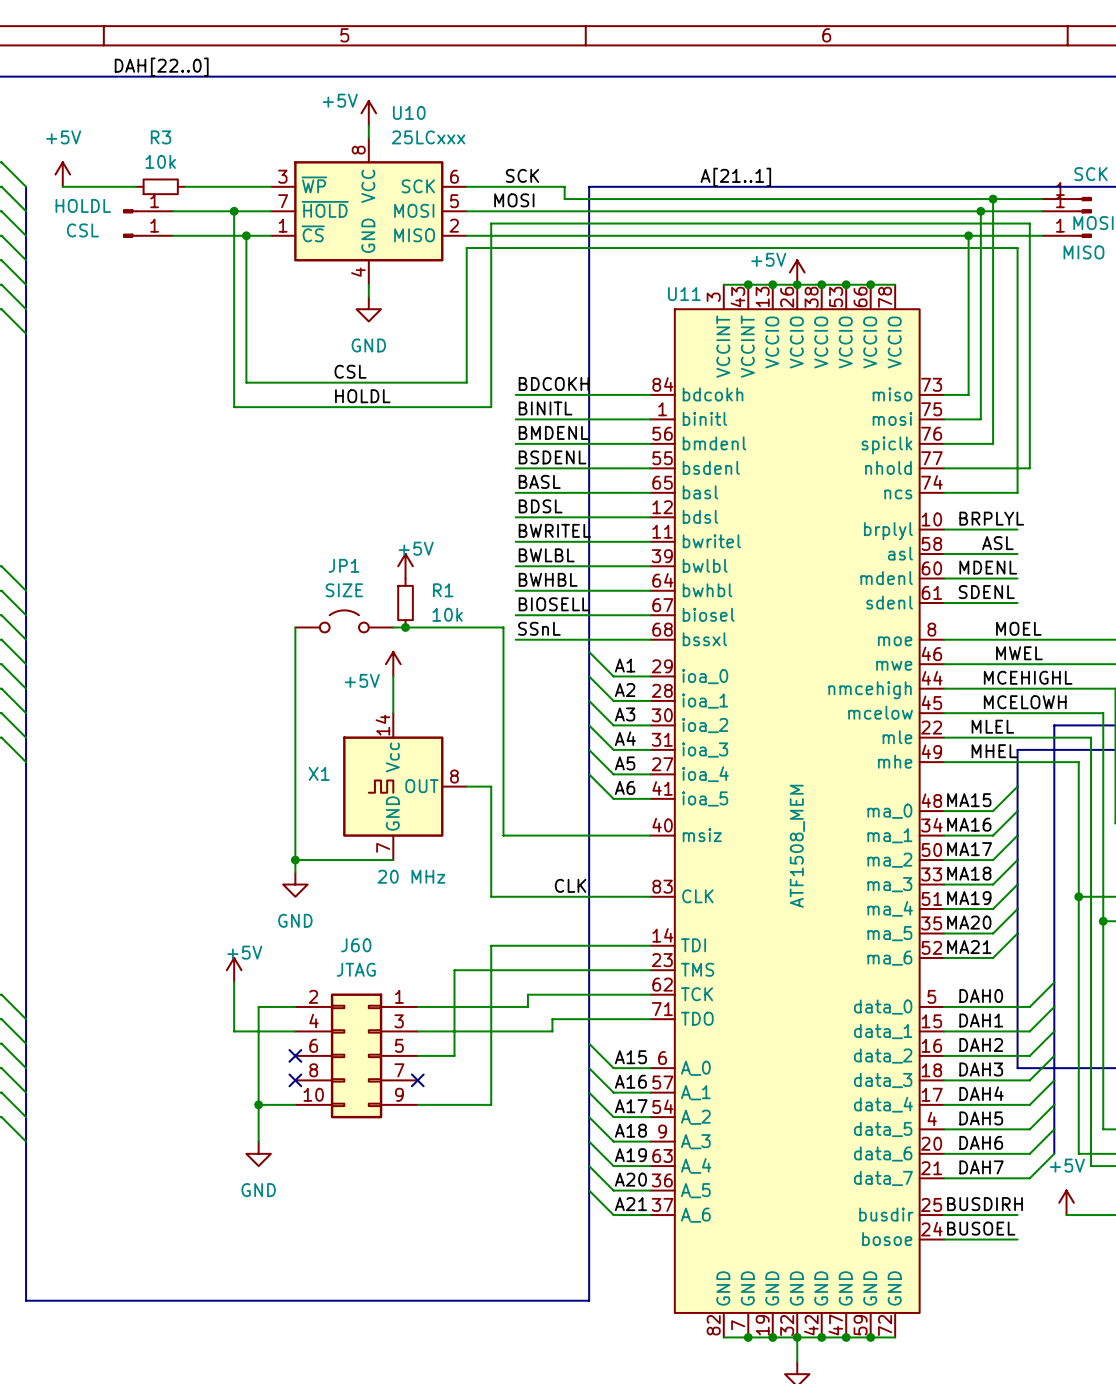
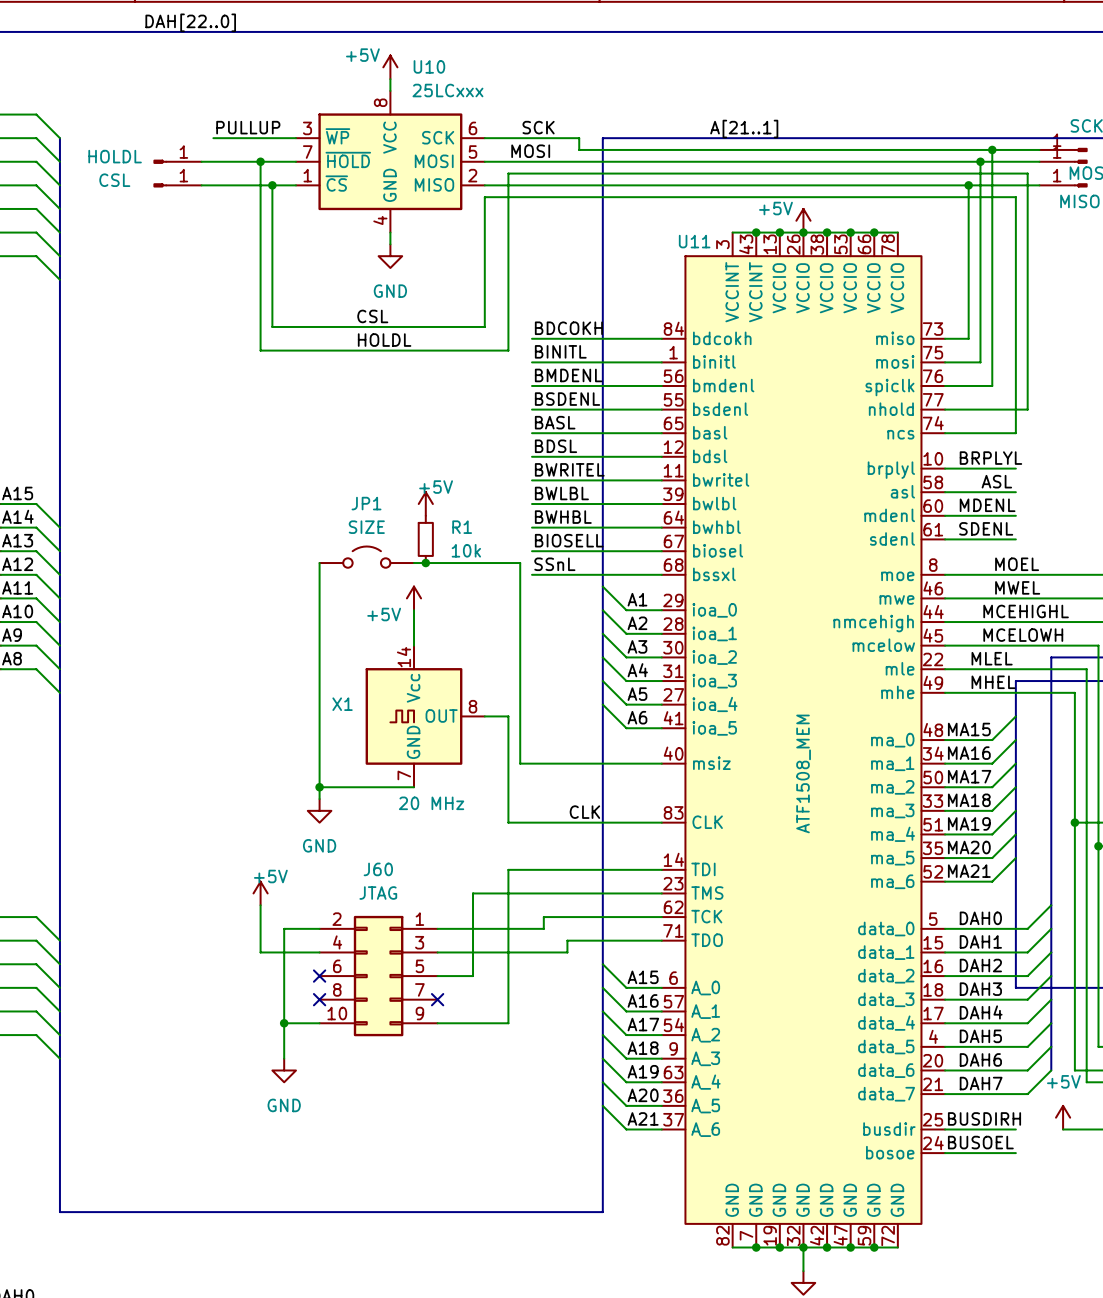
power symbol: +5V (62, 174) -> none
label: none -> PULLUP (248, 127)
wire: (62, 186) (136, 186) -> none
R3: 10k (160, 186) -> none

